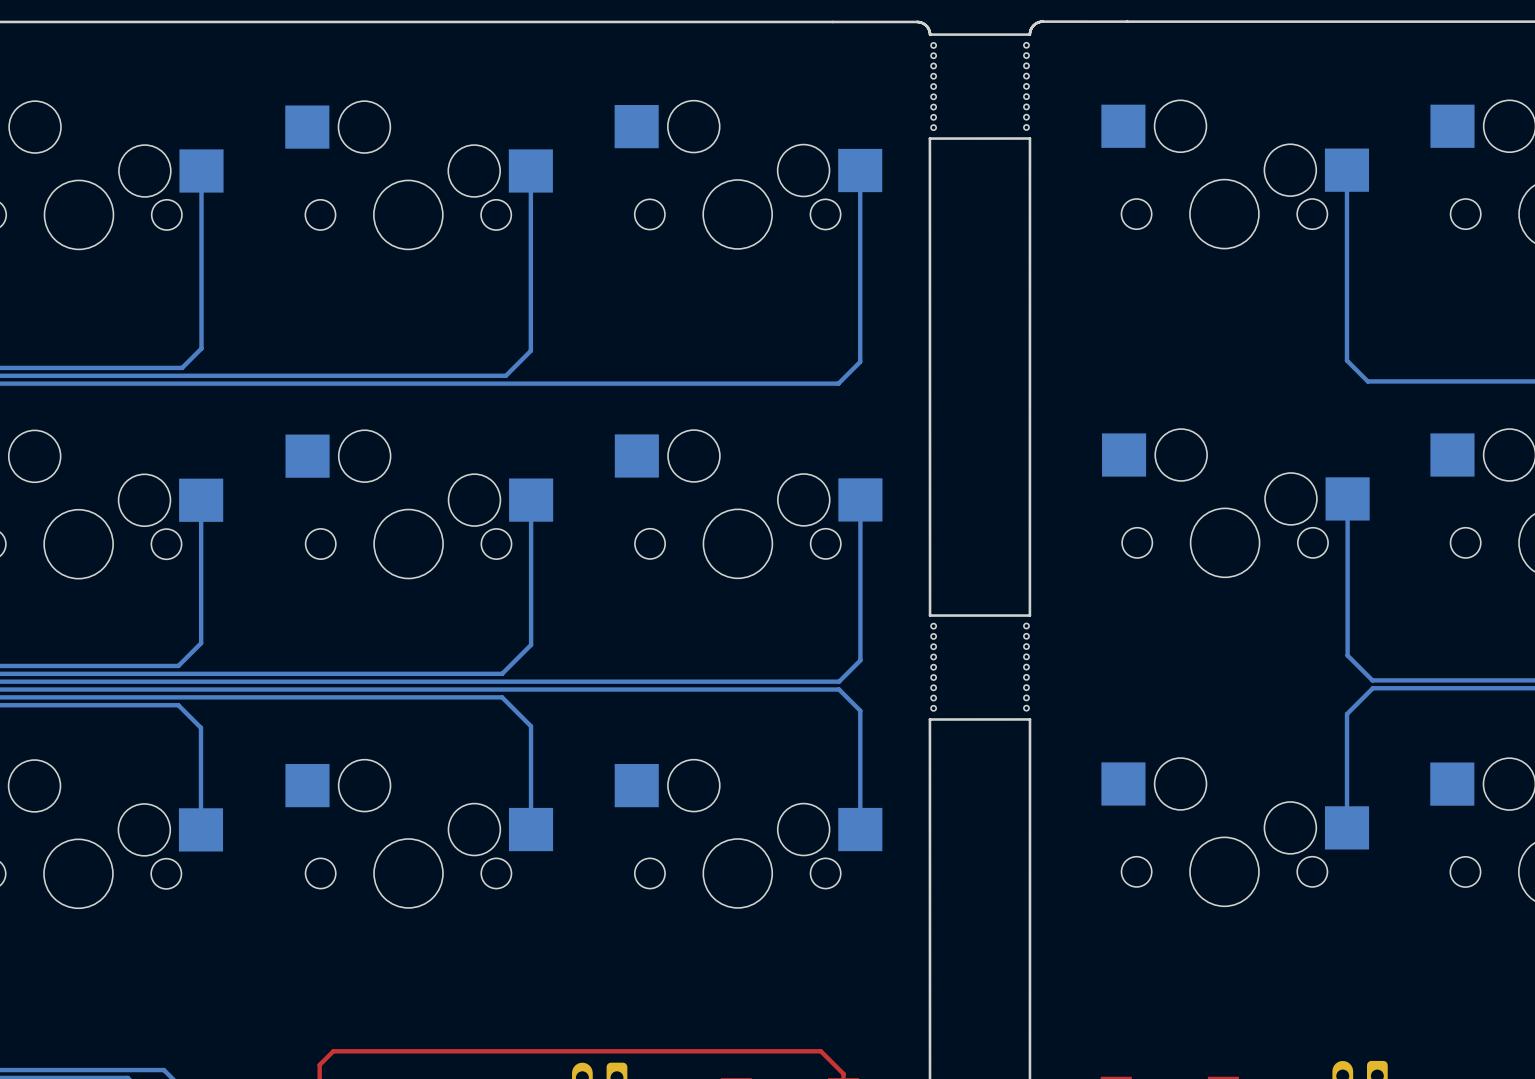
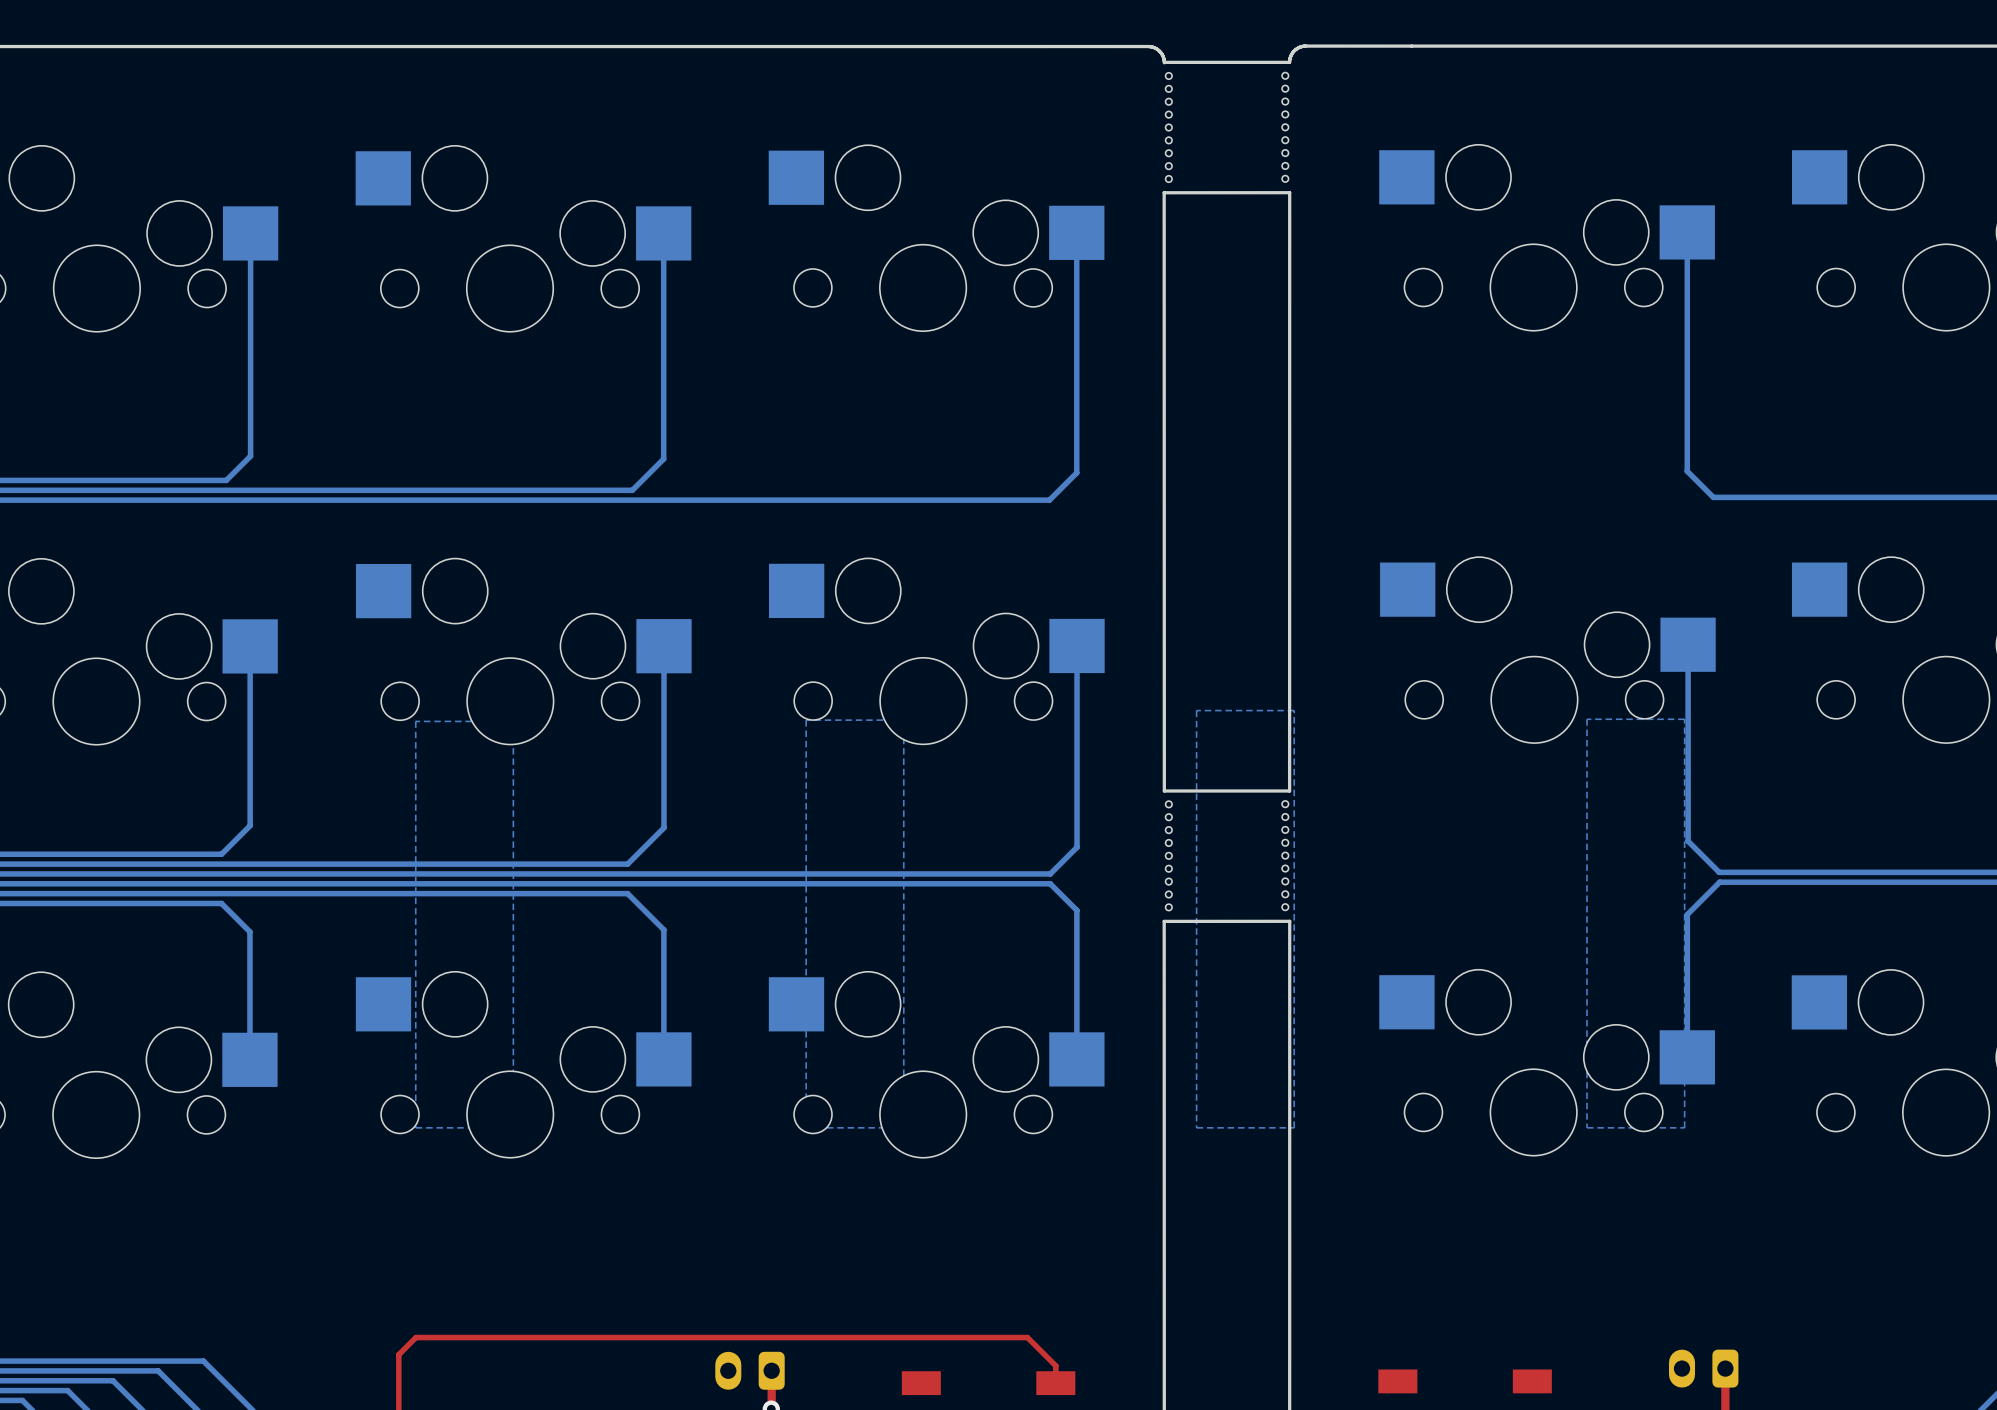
bottom zone outline: none -> (1294, 710) (1294, 1127) (1196, 1127) (1196, 710) (1294, 710)
bottom zone outline: none -> (1684, 719) (1684, 1127) (1587, 1127) (1587, 719) (1684, 719)
bottom zone outline: none -> (903, 720) (903, 1127) (806, 1127) (806, 720) (903, 720)
bottom zone outline: none -> (513, 721) (513, 1127) (415, 1127) (415, 721) (513, 721)

